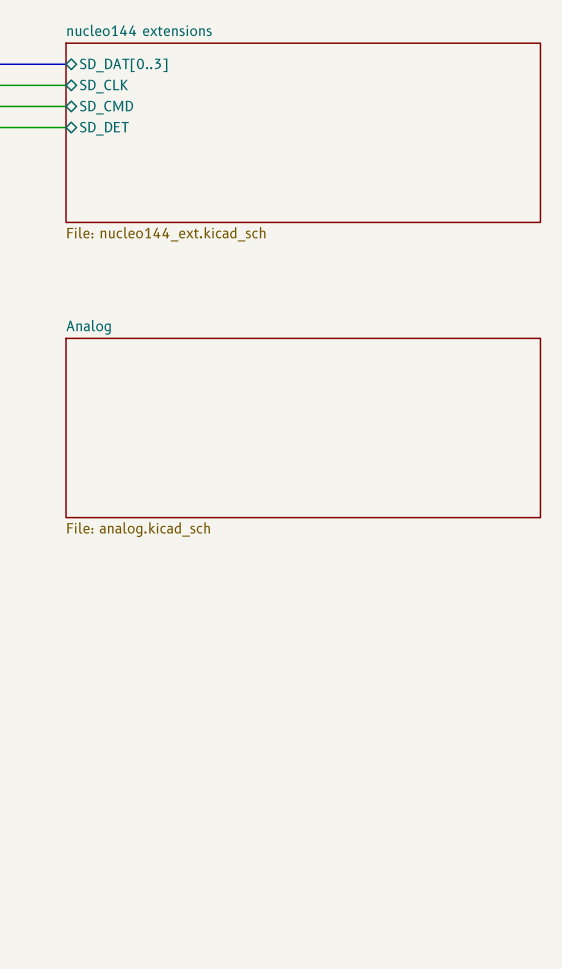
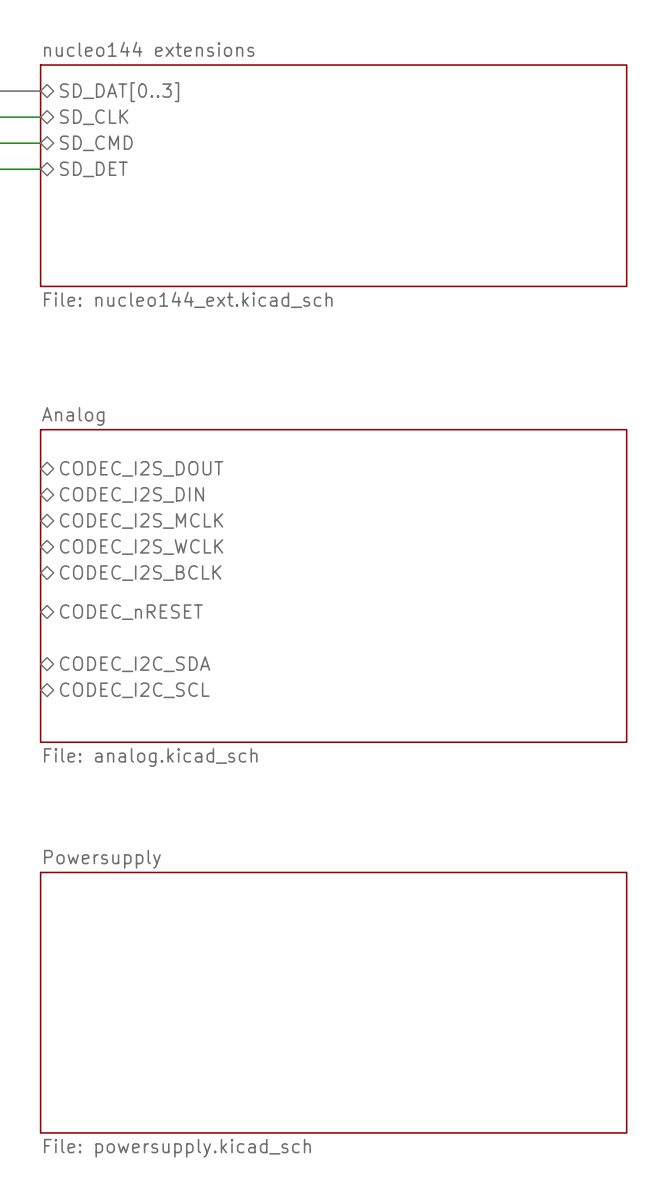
sheet pin: none -> CODEC_I2S_DOUT (141, 468)
sheet pin: none -> CODEC_I2S_DIN (131, 494)
sheet pin: none -> CODEC_I2S_MCLK (141, 520)
sheet Analog: File: analog.kicad_sch (303, 427) -> none
sheet pin: none -> CODEC_I2S_WCLK (141, 547)
sheet pin: none -> CODEC_I2S_BCLK (140, 573)
sheet Analog: none -> File: analog.kicad_sch (333, 585)
sheet pin: none -> CODEC_nRESET (131, 612)
sheet pin: none -> CODEC_I2C_SDA (135, 664)
sheet pin: none -> CODEC_I2C_SCL (134, 690)
sheet Powersupply: none -> File: powersupply.kicad_sch (333, 1002)

